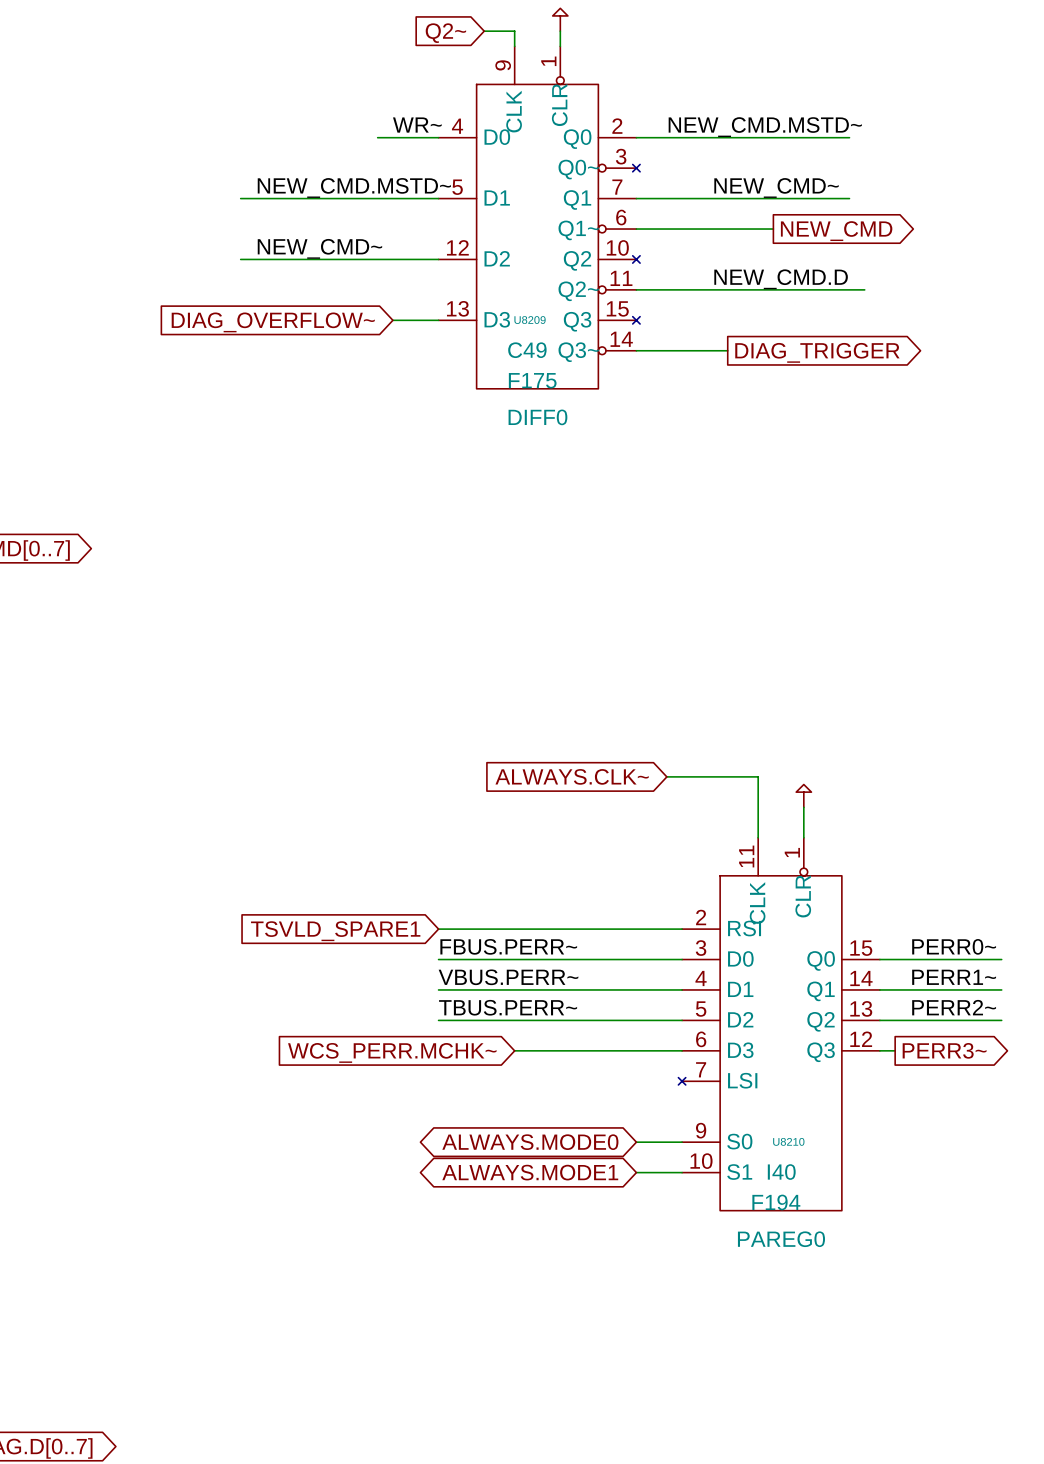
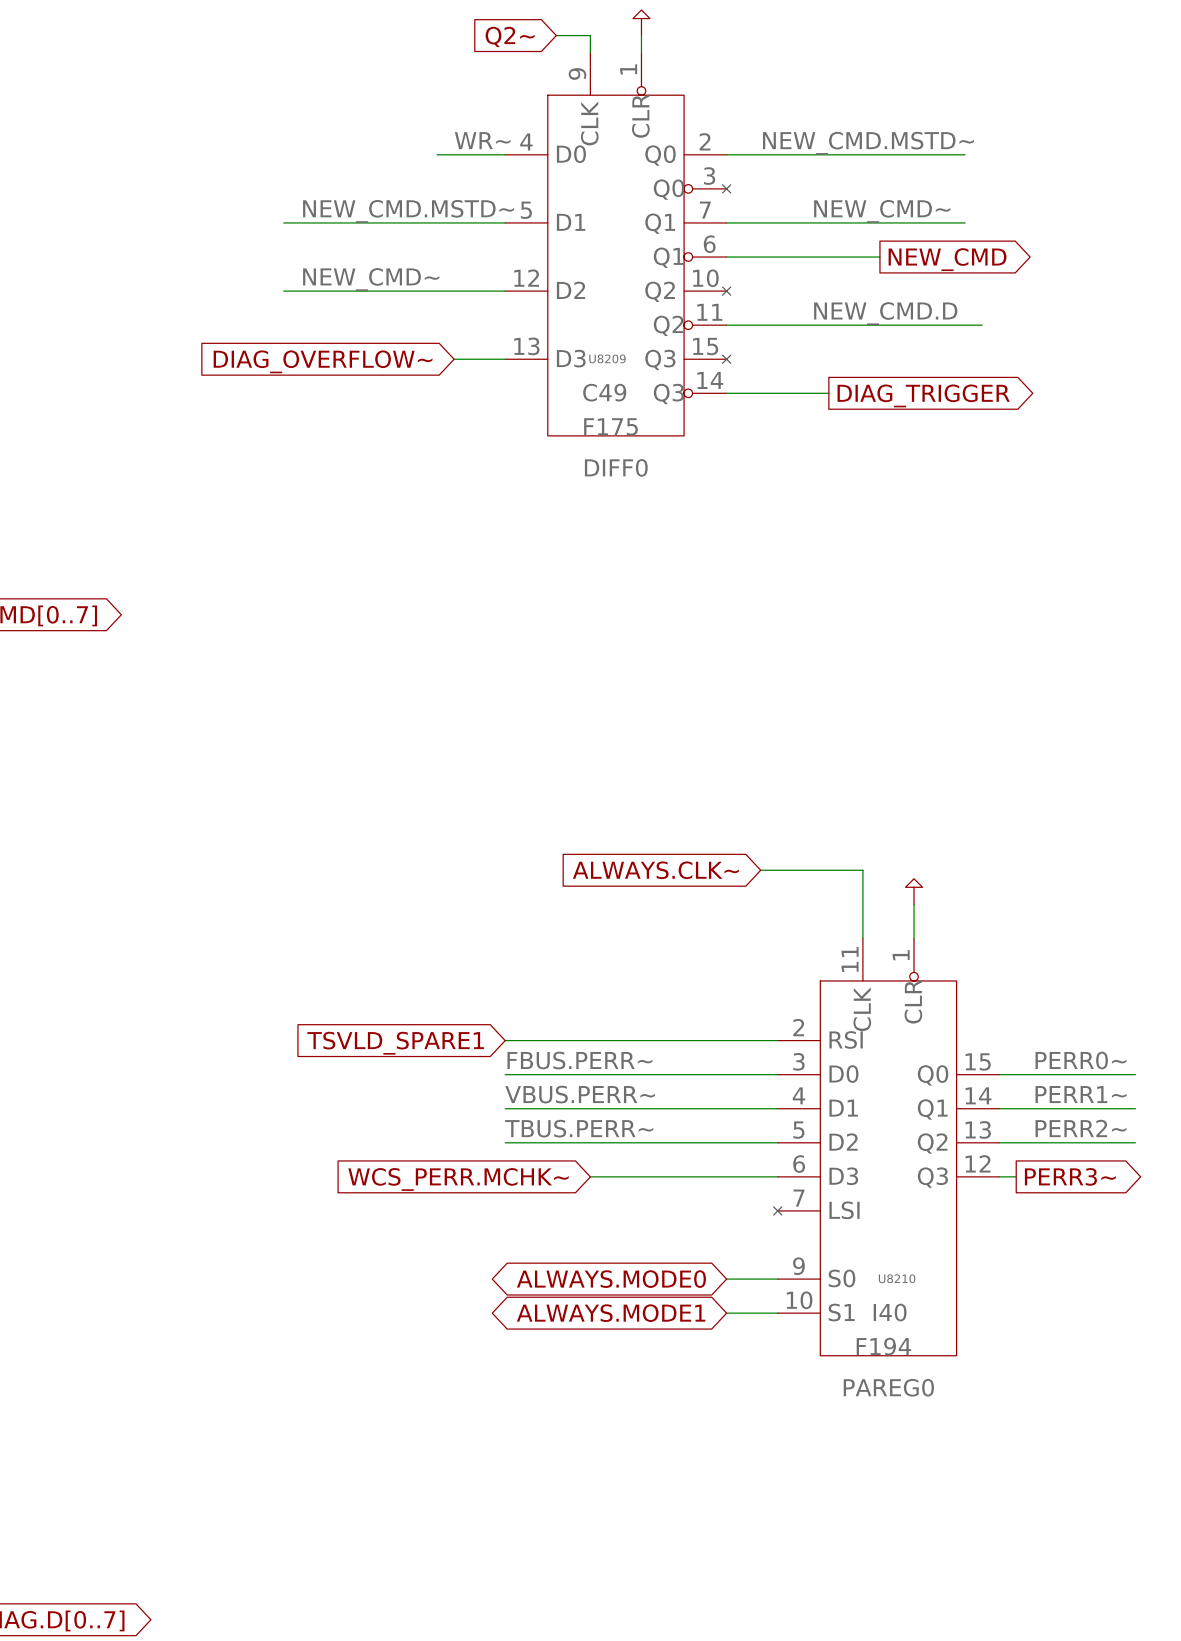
U8209 pin name: Q0~ (578, 169) -> Q0 (669, 189)
U8209 pin name: Q1~ (578, 230) -> Q1 (668, 257)
U8209 pin name: Q2~ (578, 291) -> Q2 (668, 325)
U8209 pin name: Q3~ (578, 352) -> Q3 (668, 394)

